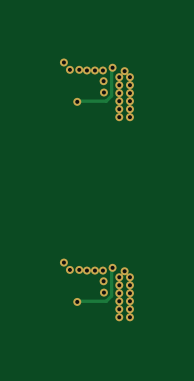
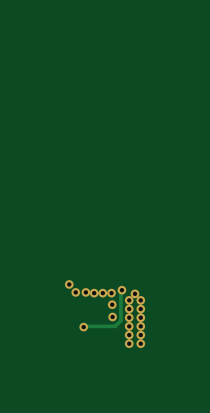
via: (63, 62) -> none
via: (112, 67) -> none
via: (69, 69) -> none
via: (79, 69) -> none
via: (86, 70) -> none
via: (94, 70) -> none
via: (102, 70) -> none
track: (111, 71) (111, 95) (106, 101) (77, 101) -> none
via: (124, 71) -> none
via: (119, 77) -> none
via: (129, 77) -> none
via: (103, 81) -> none
via: (119, 85) -> none
via: (129, 85) -> none
via: (103, 92) -> none
via: (119, 93) -> none
via: (129, 93) -> none
via: (77, 101) -> none
via: (119, 101) -> none
via: (129, 101) -> none
via: (119, 109) -> none
via: (129, 109) -> none
via: (119, 117) -> none
via: (129, 117) -> none

